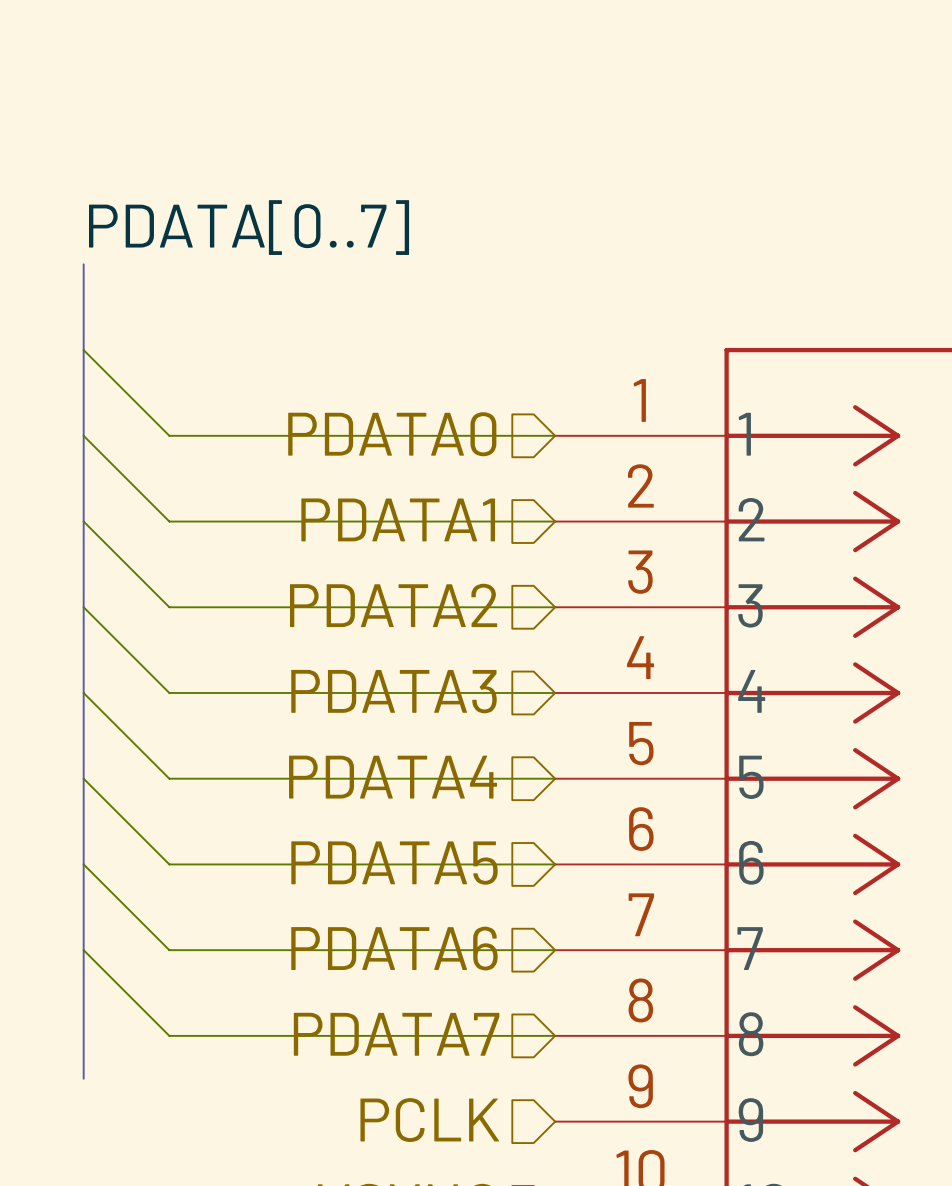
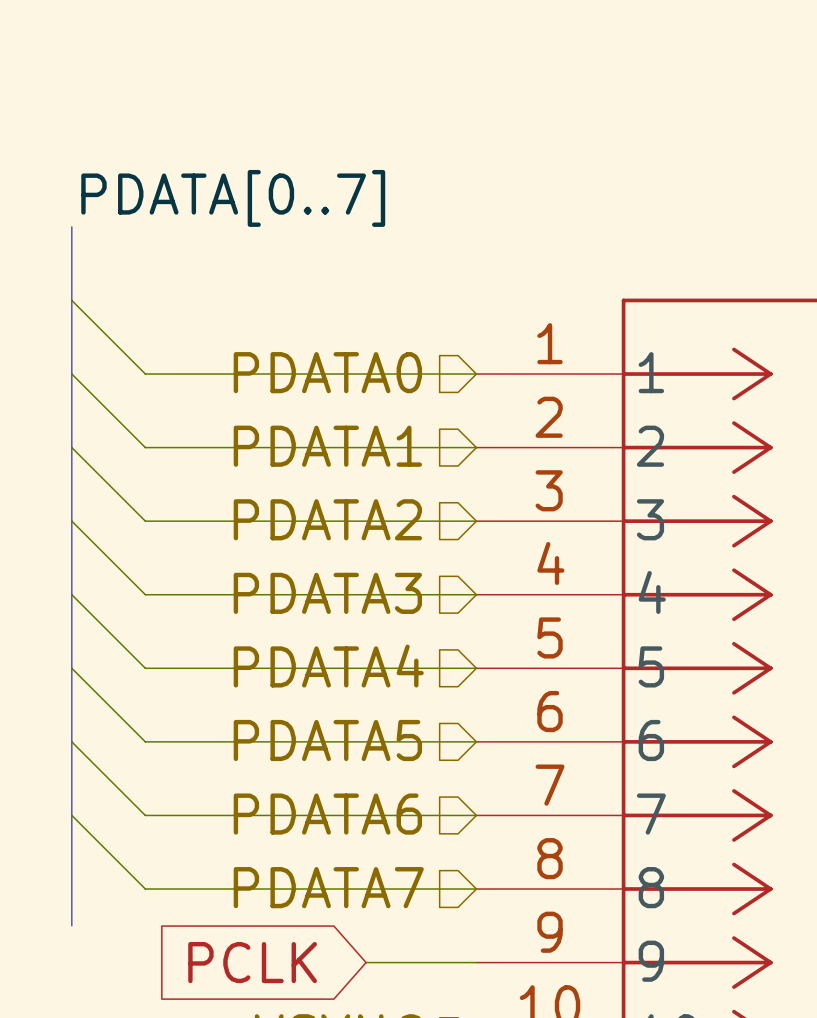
hierarchical label: PCLK (429, 1120) -> none
global label: none -> PCLK (252, 962)
wire: none -> (366, 962) (476, 962)

